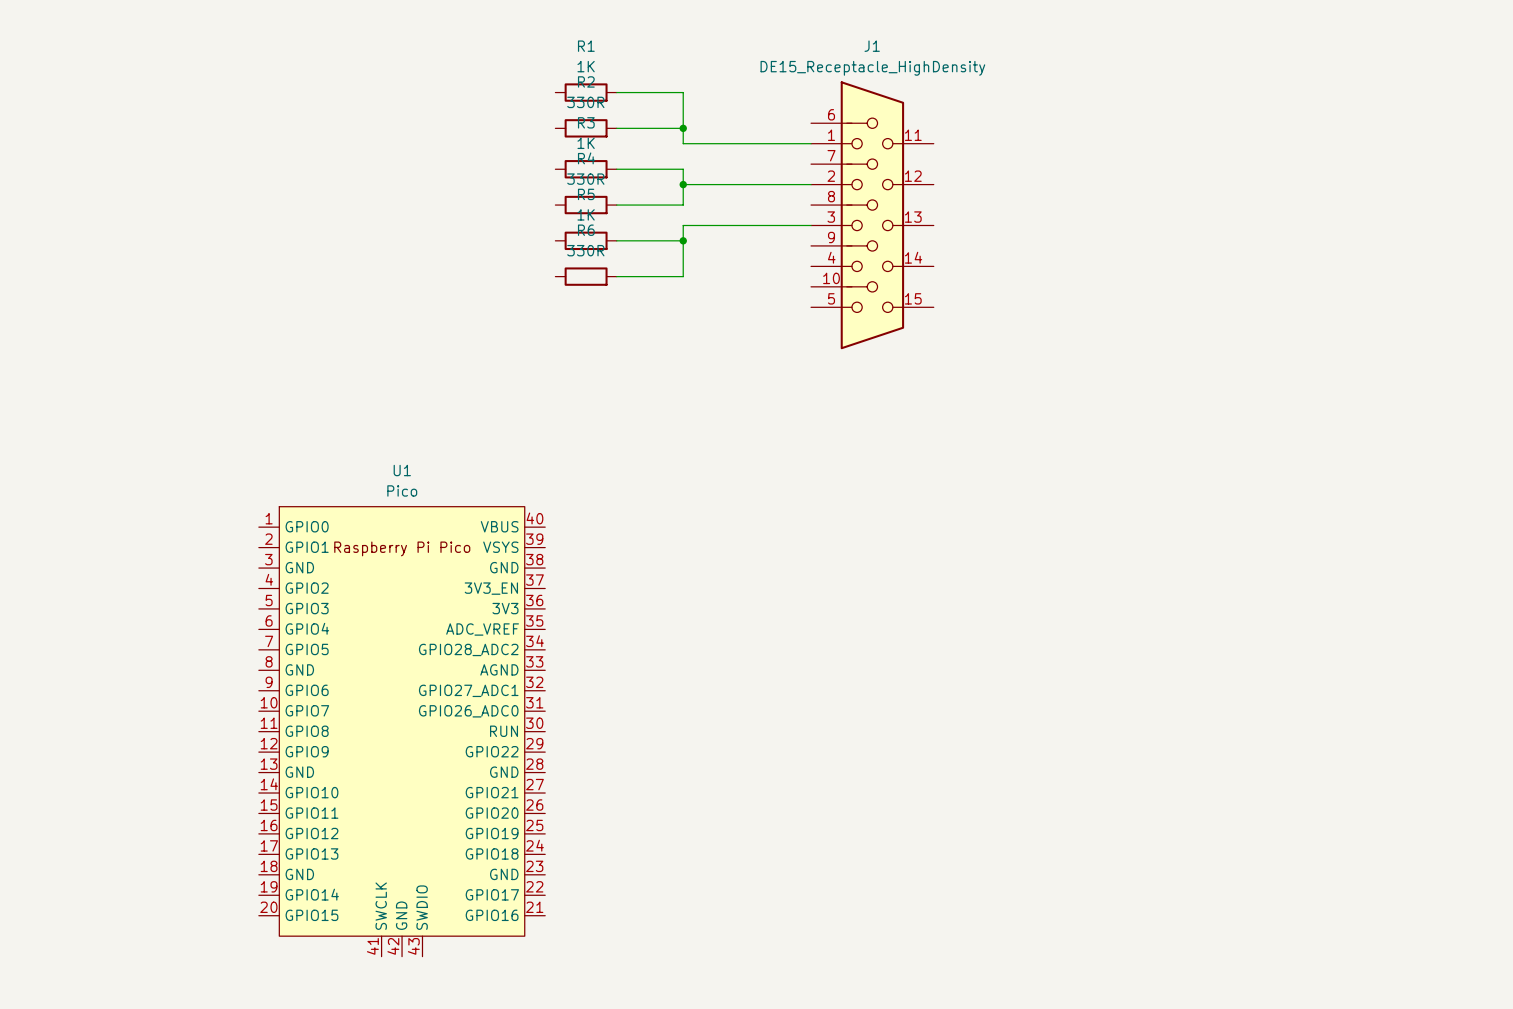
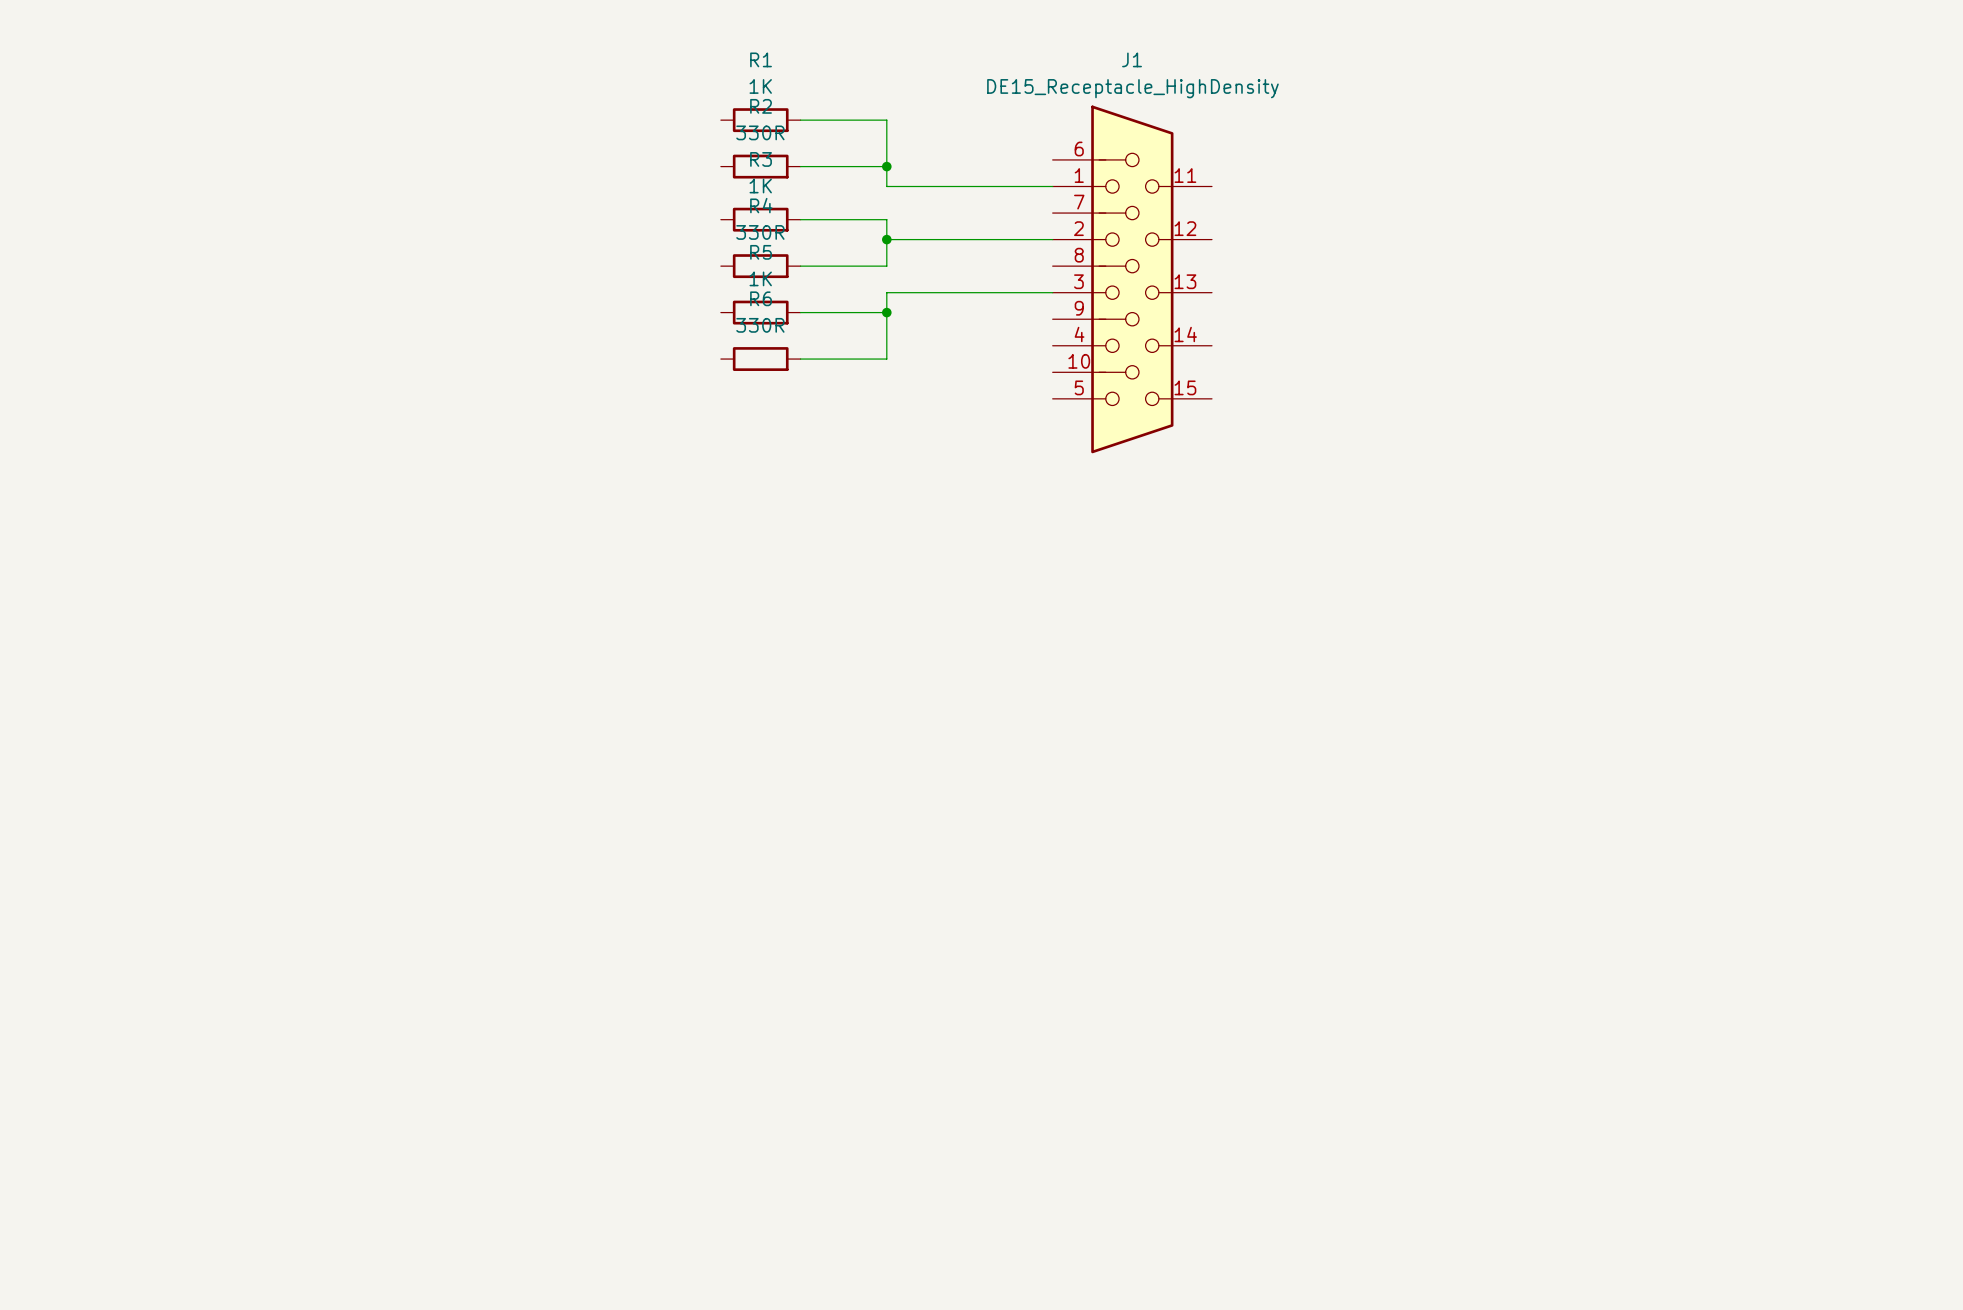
U1: Pico (402, 731) -> none

